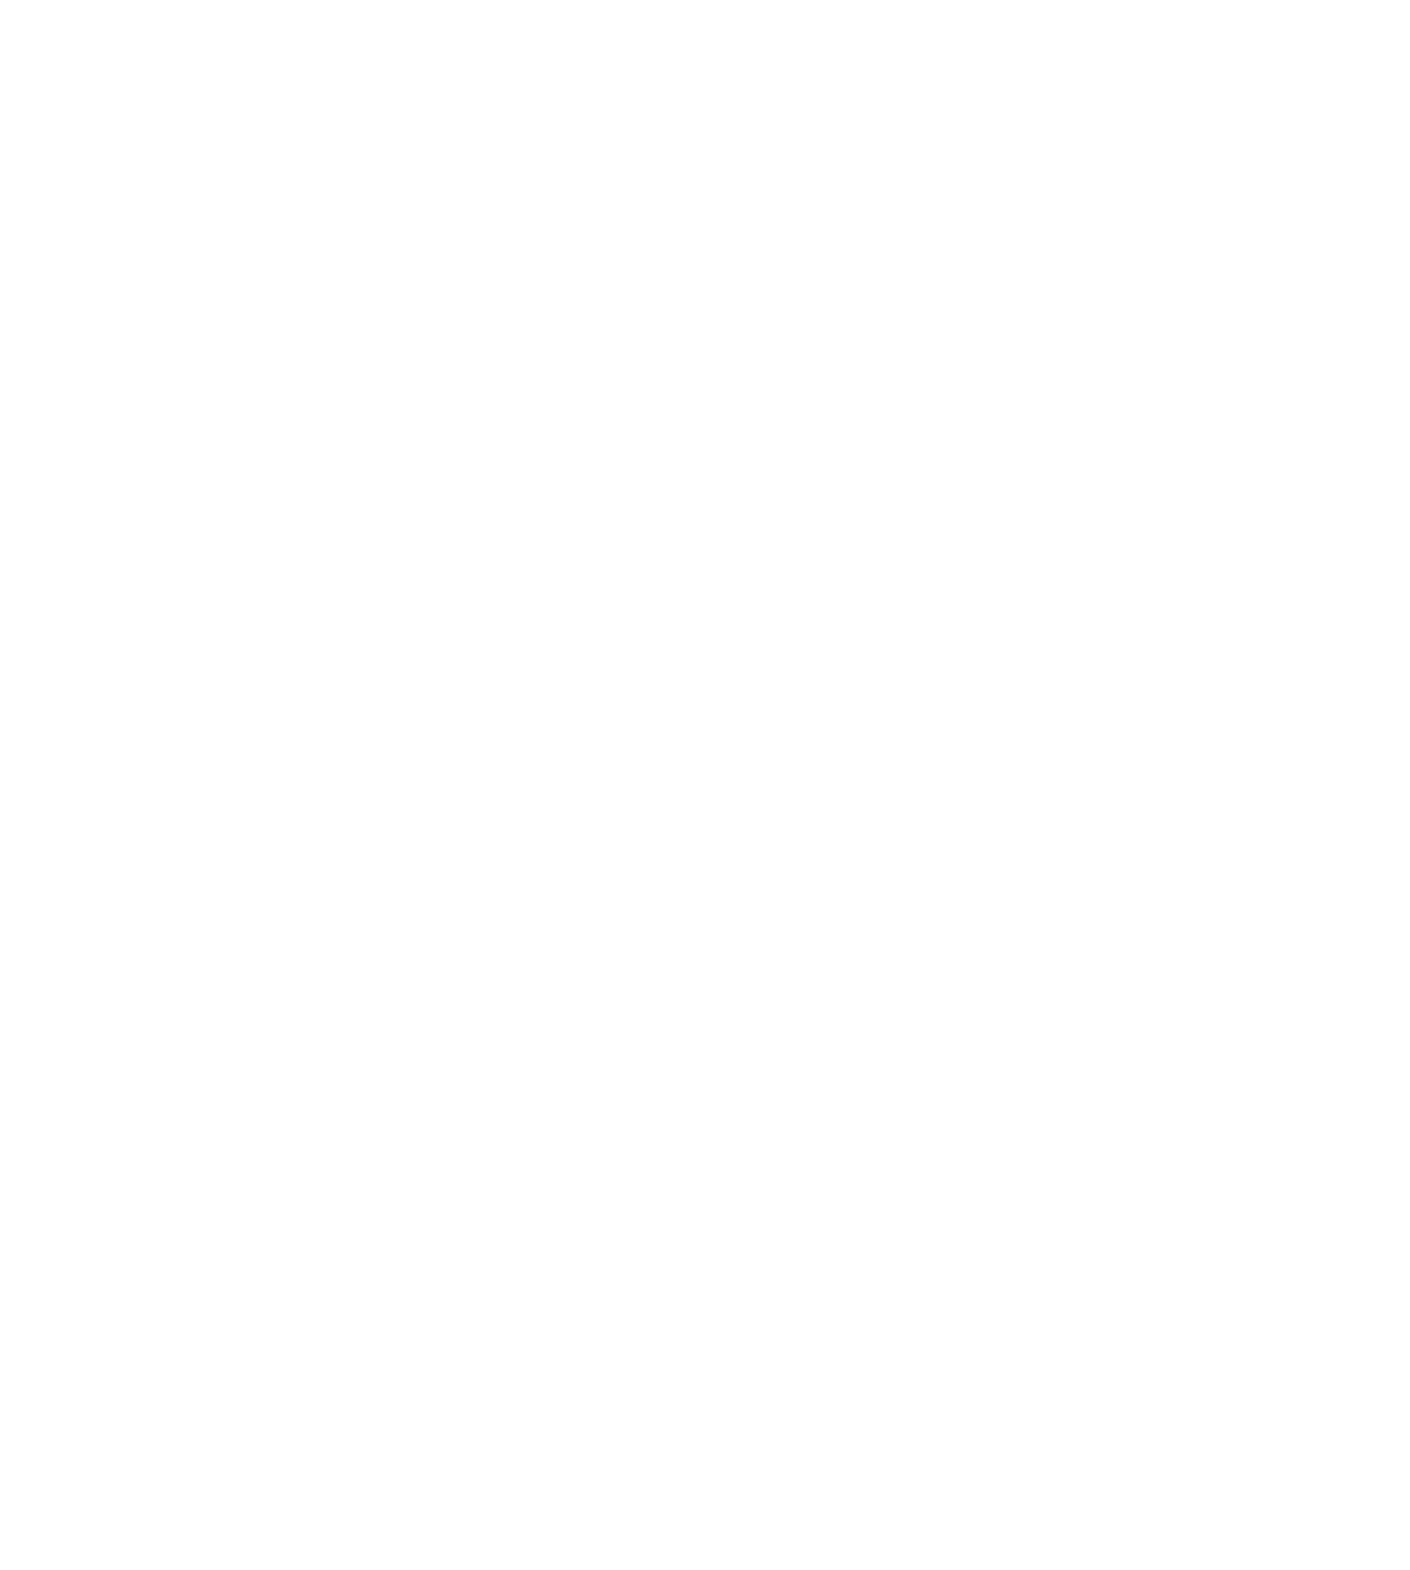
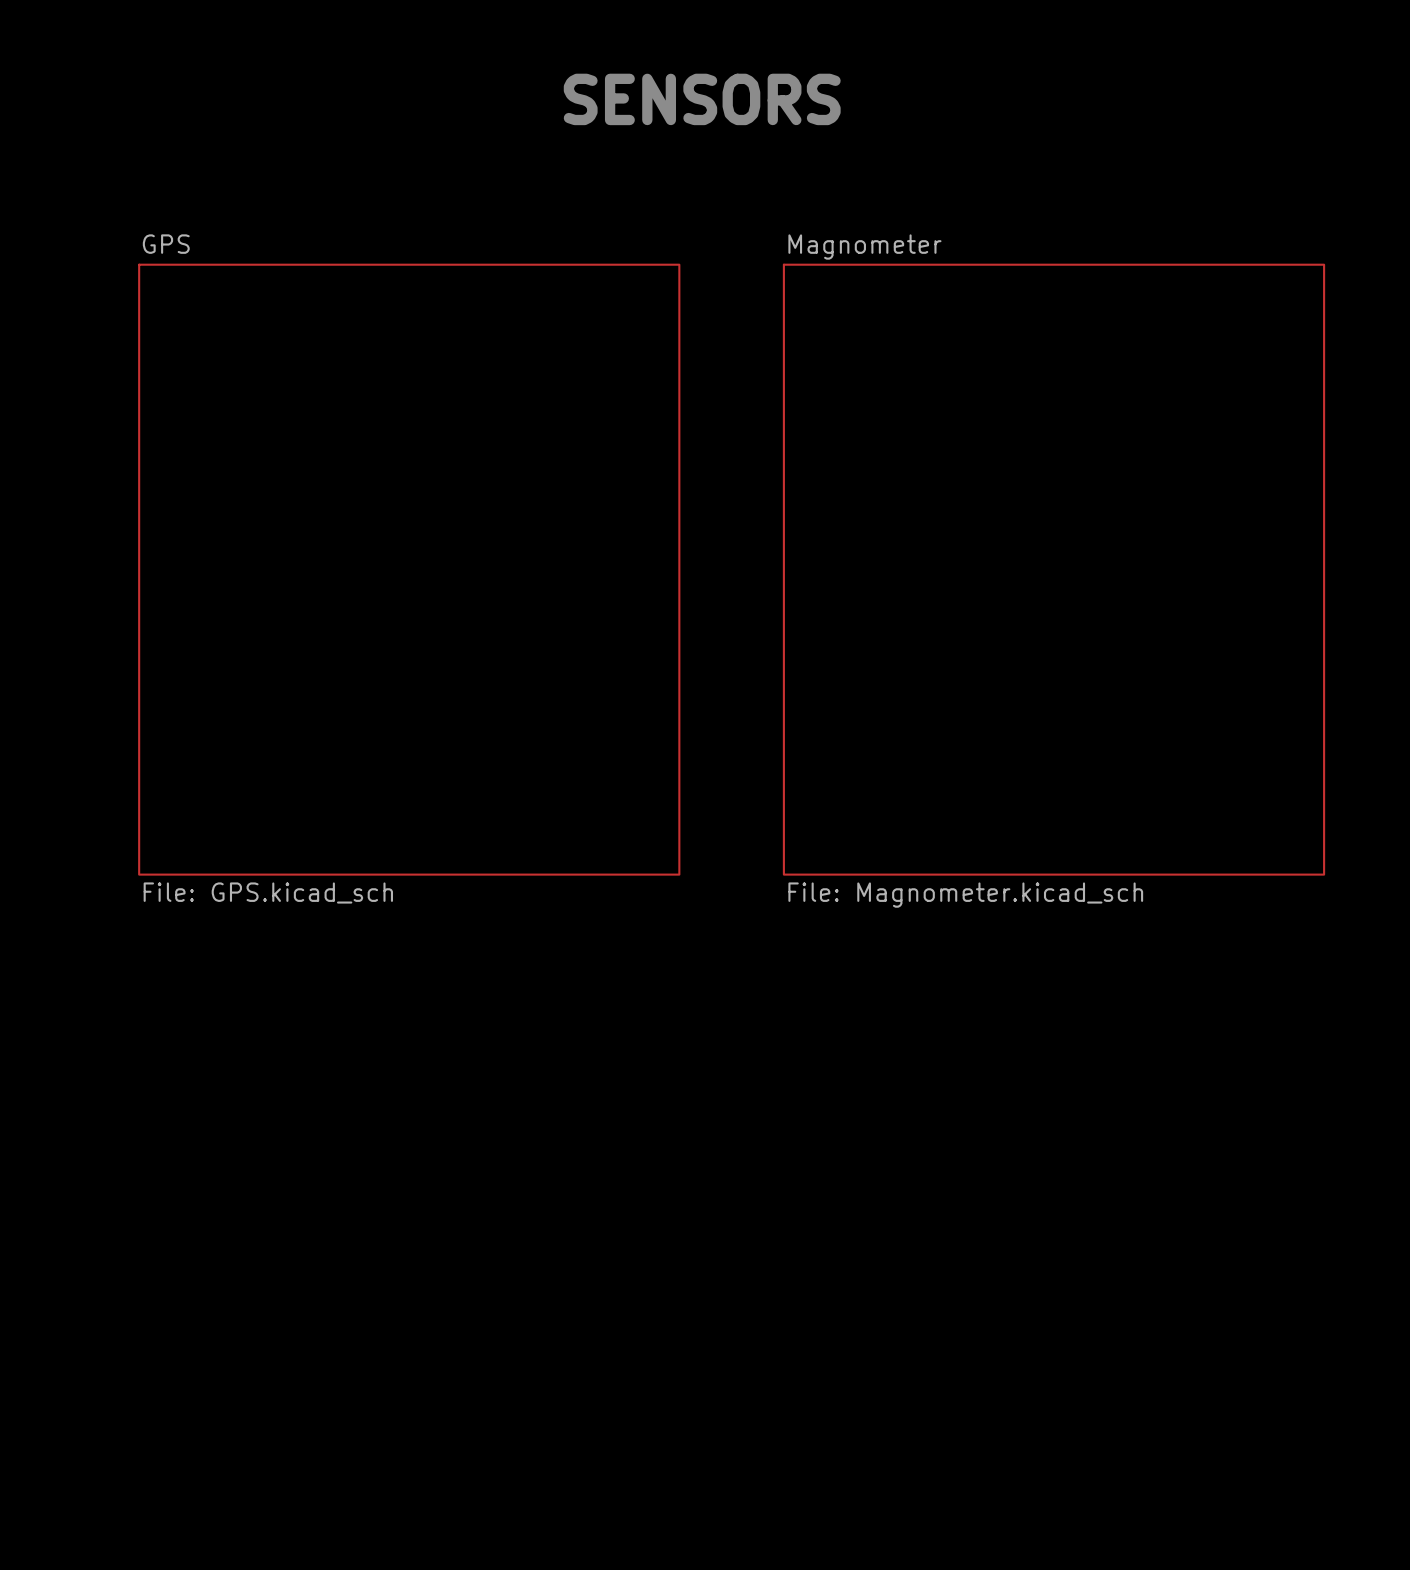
text: none -> SENSORS (702, 99)
sheet GPS: none -> File: GPS.kicad_sch (409, 569)
sheet Magnometer: none -> File: Magnometer.kicad_sch (1054, 569)

